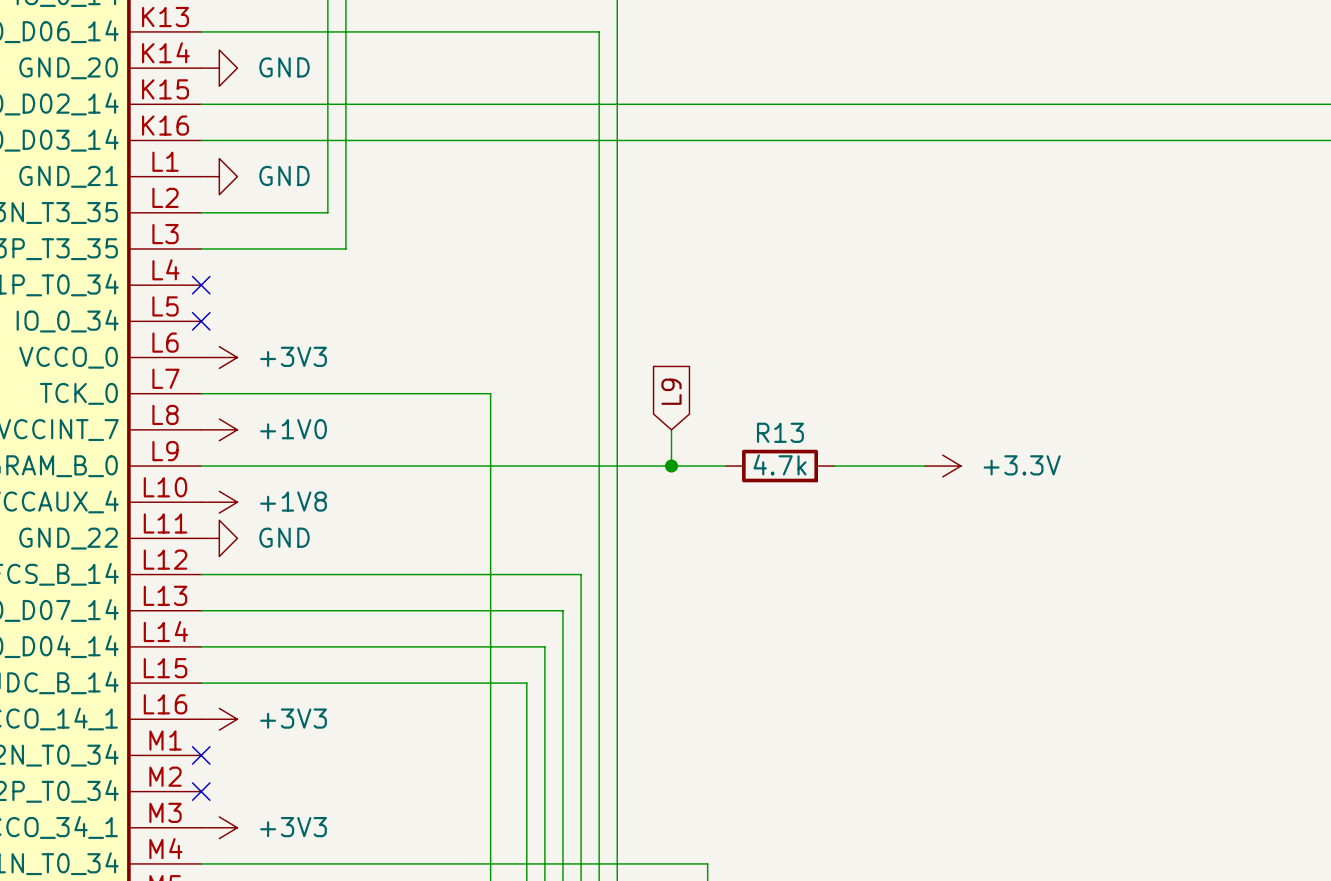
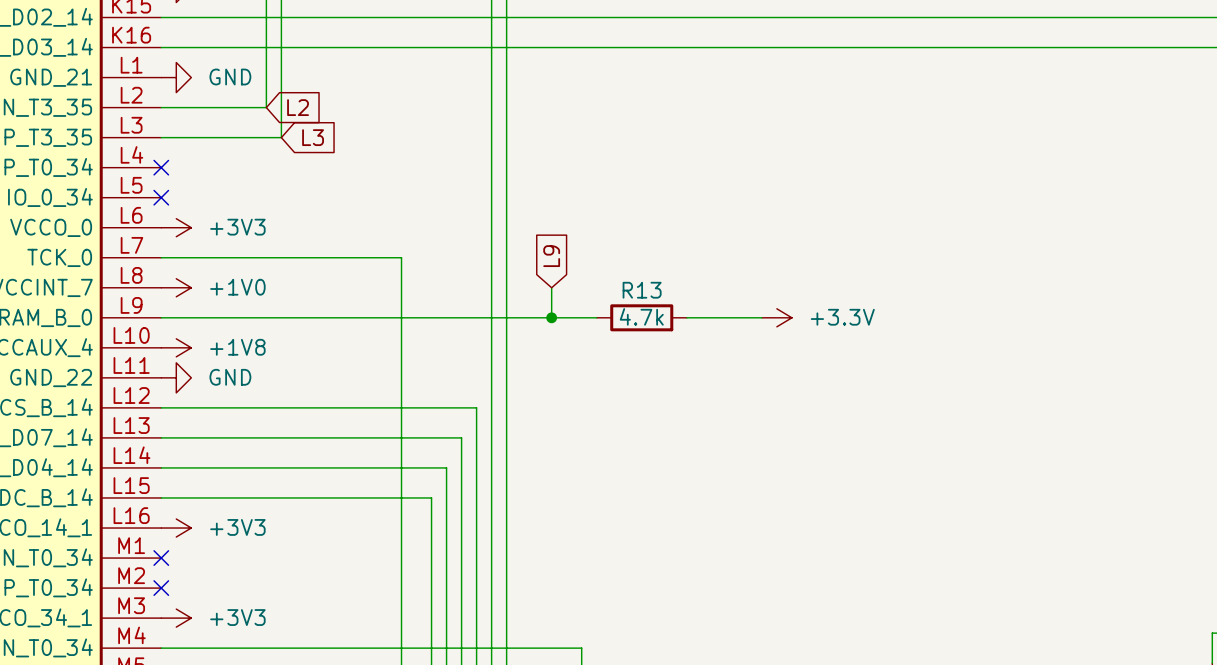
global label: none -> L2 (298, 107)
global label: none -> L3 (313, 137)

